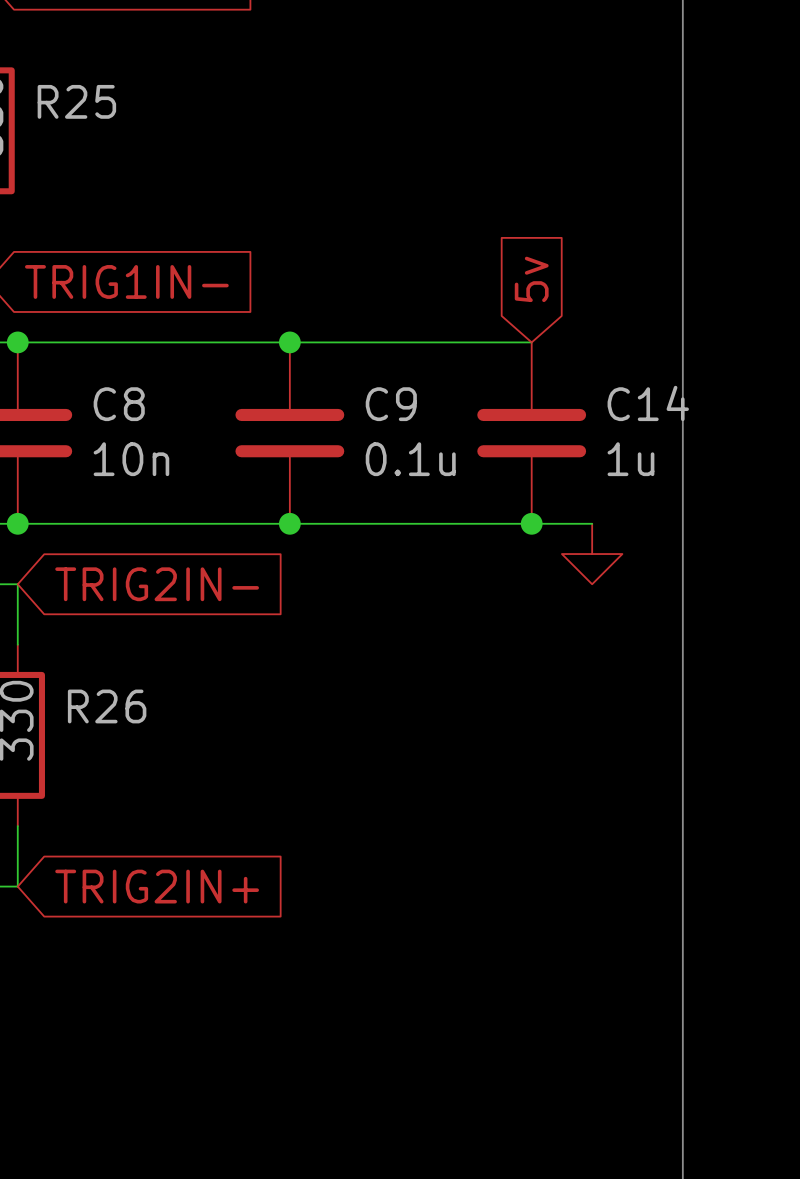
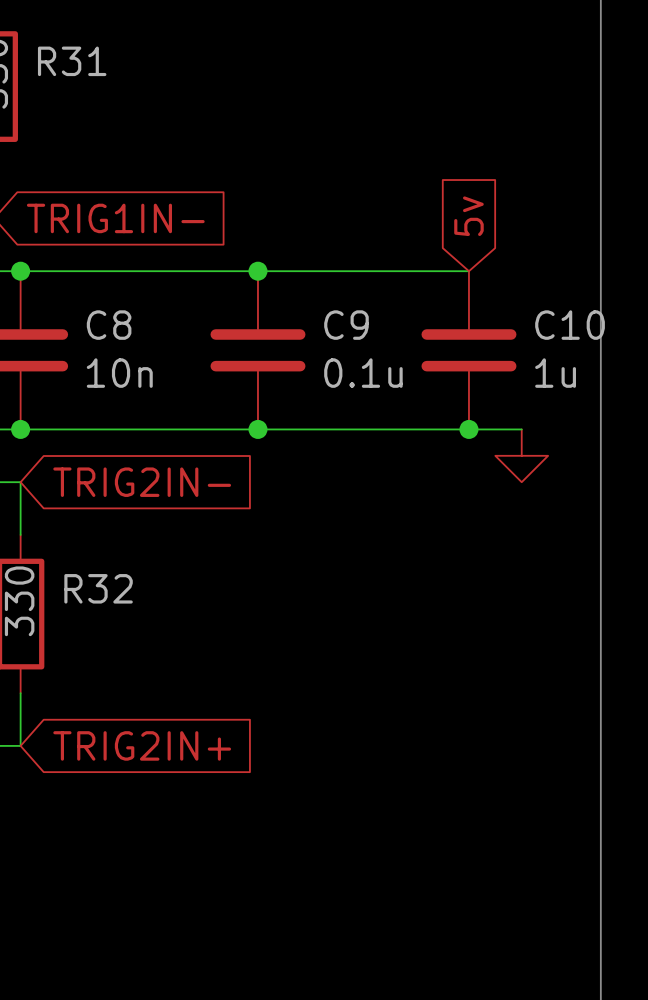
R25 name: R25 (76, 101) -> R31 (72, 61)
C14 name: C14 (648, 403) -> C10 (570, 325)
R26 name: R26 (107, 706) -> R32 (98, 588)

